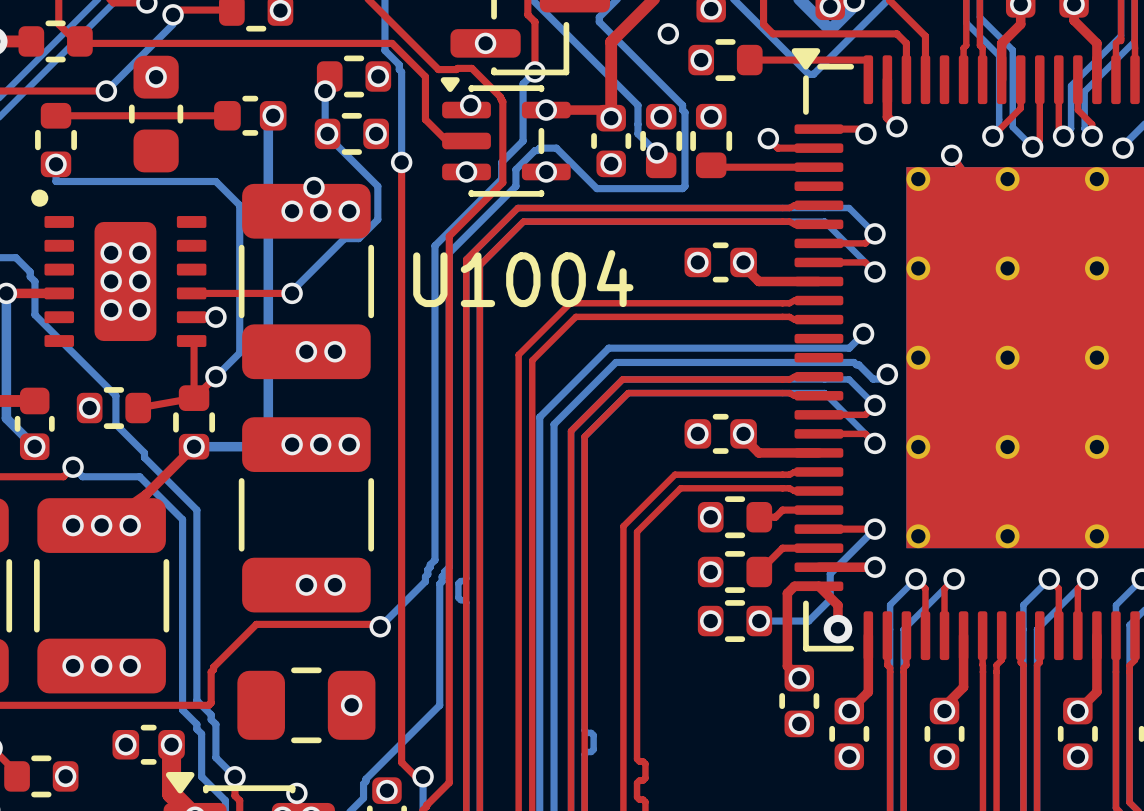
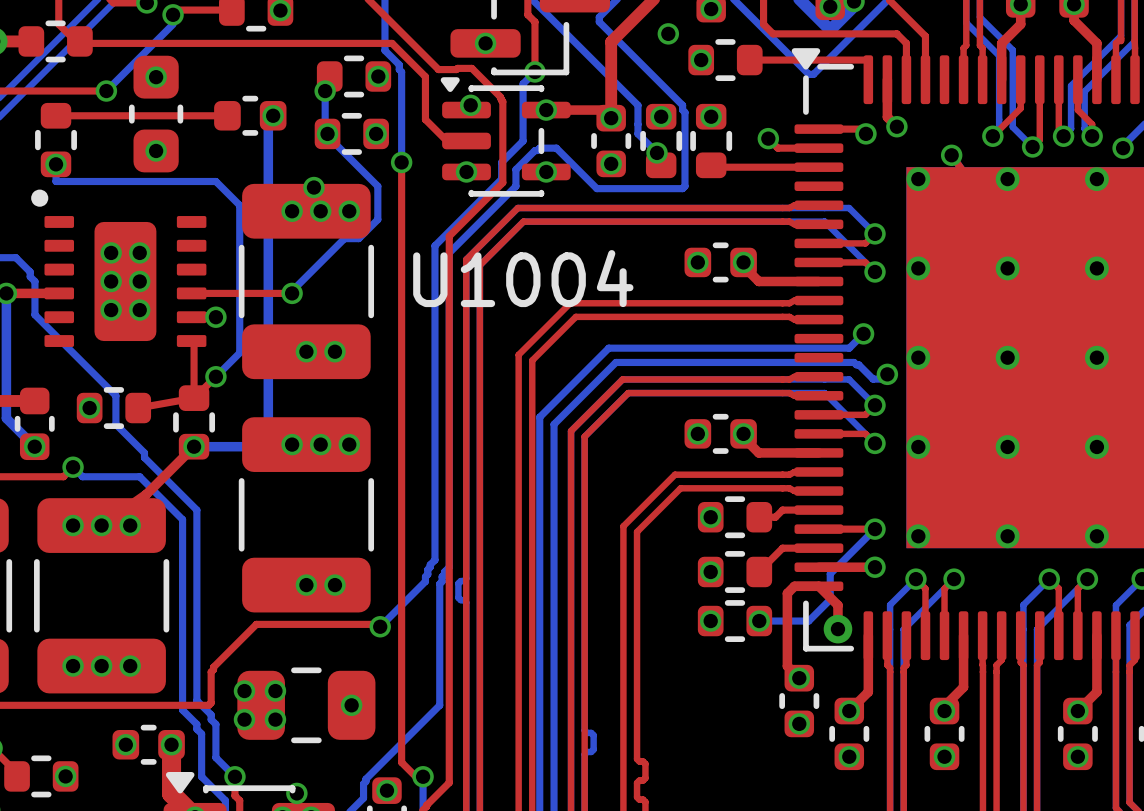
via: none -> (156, 150)
via: none -> (244, 691)
via: none -> (275, 691)
via: none -> (244, 719)
via: none -> (275, 719)

